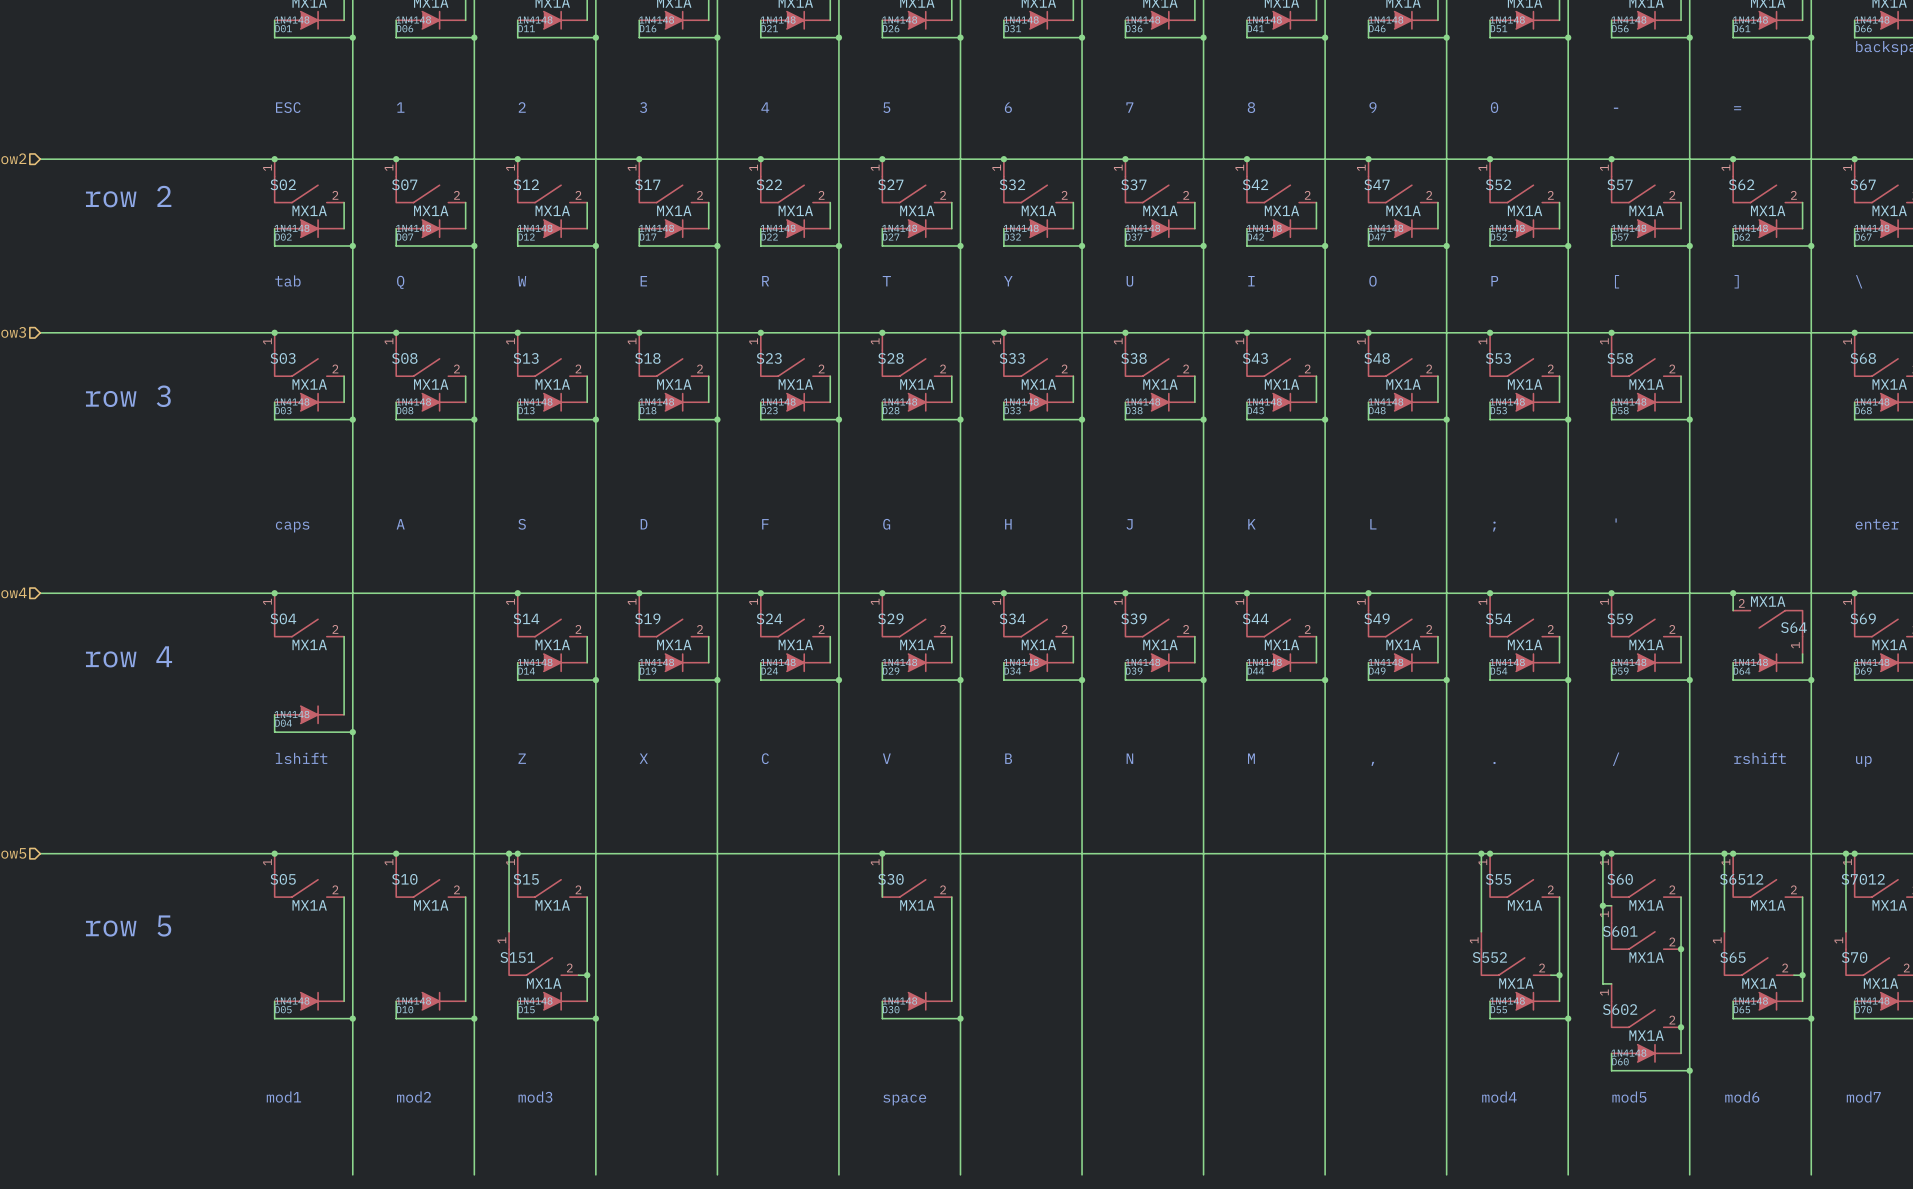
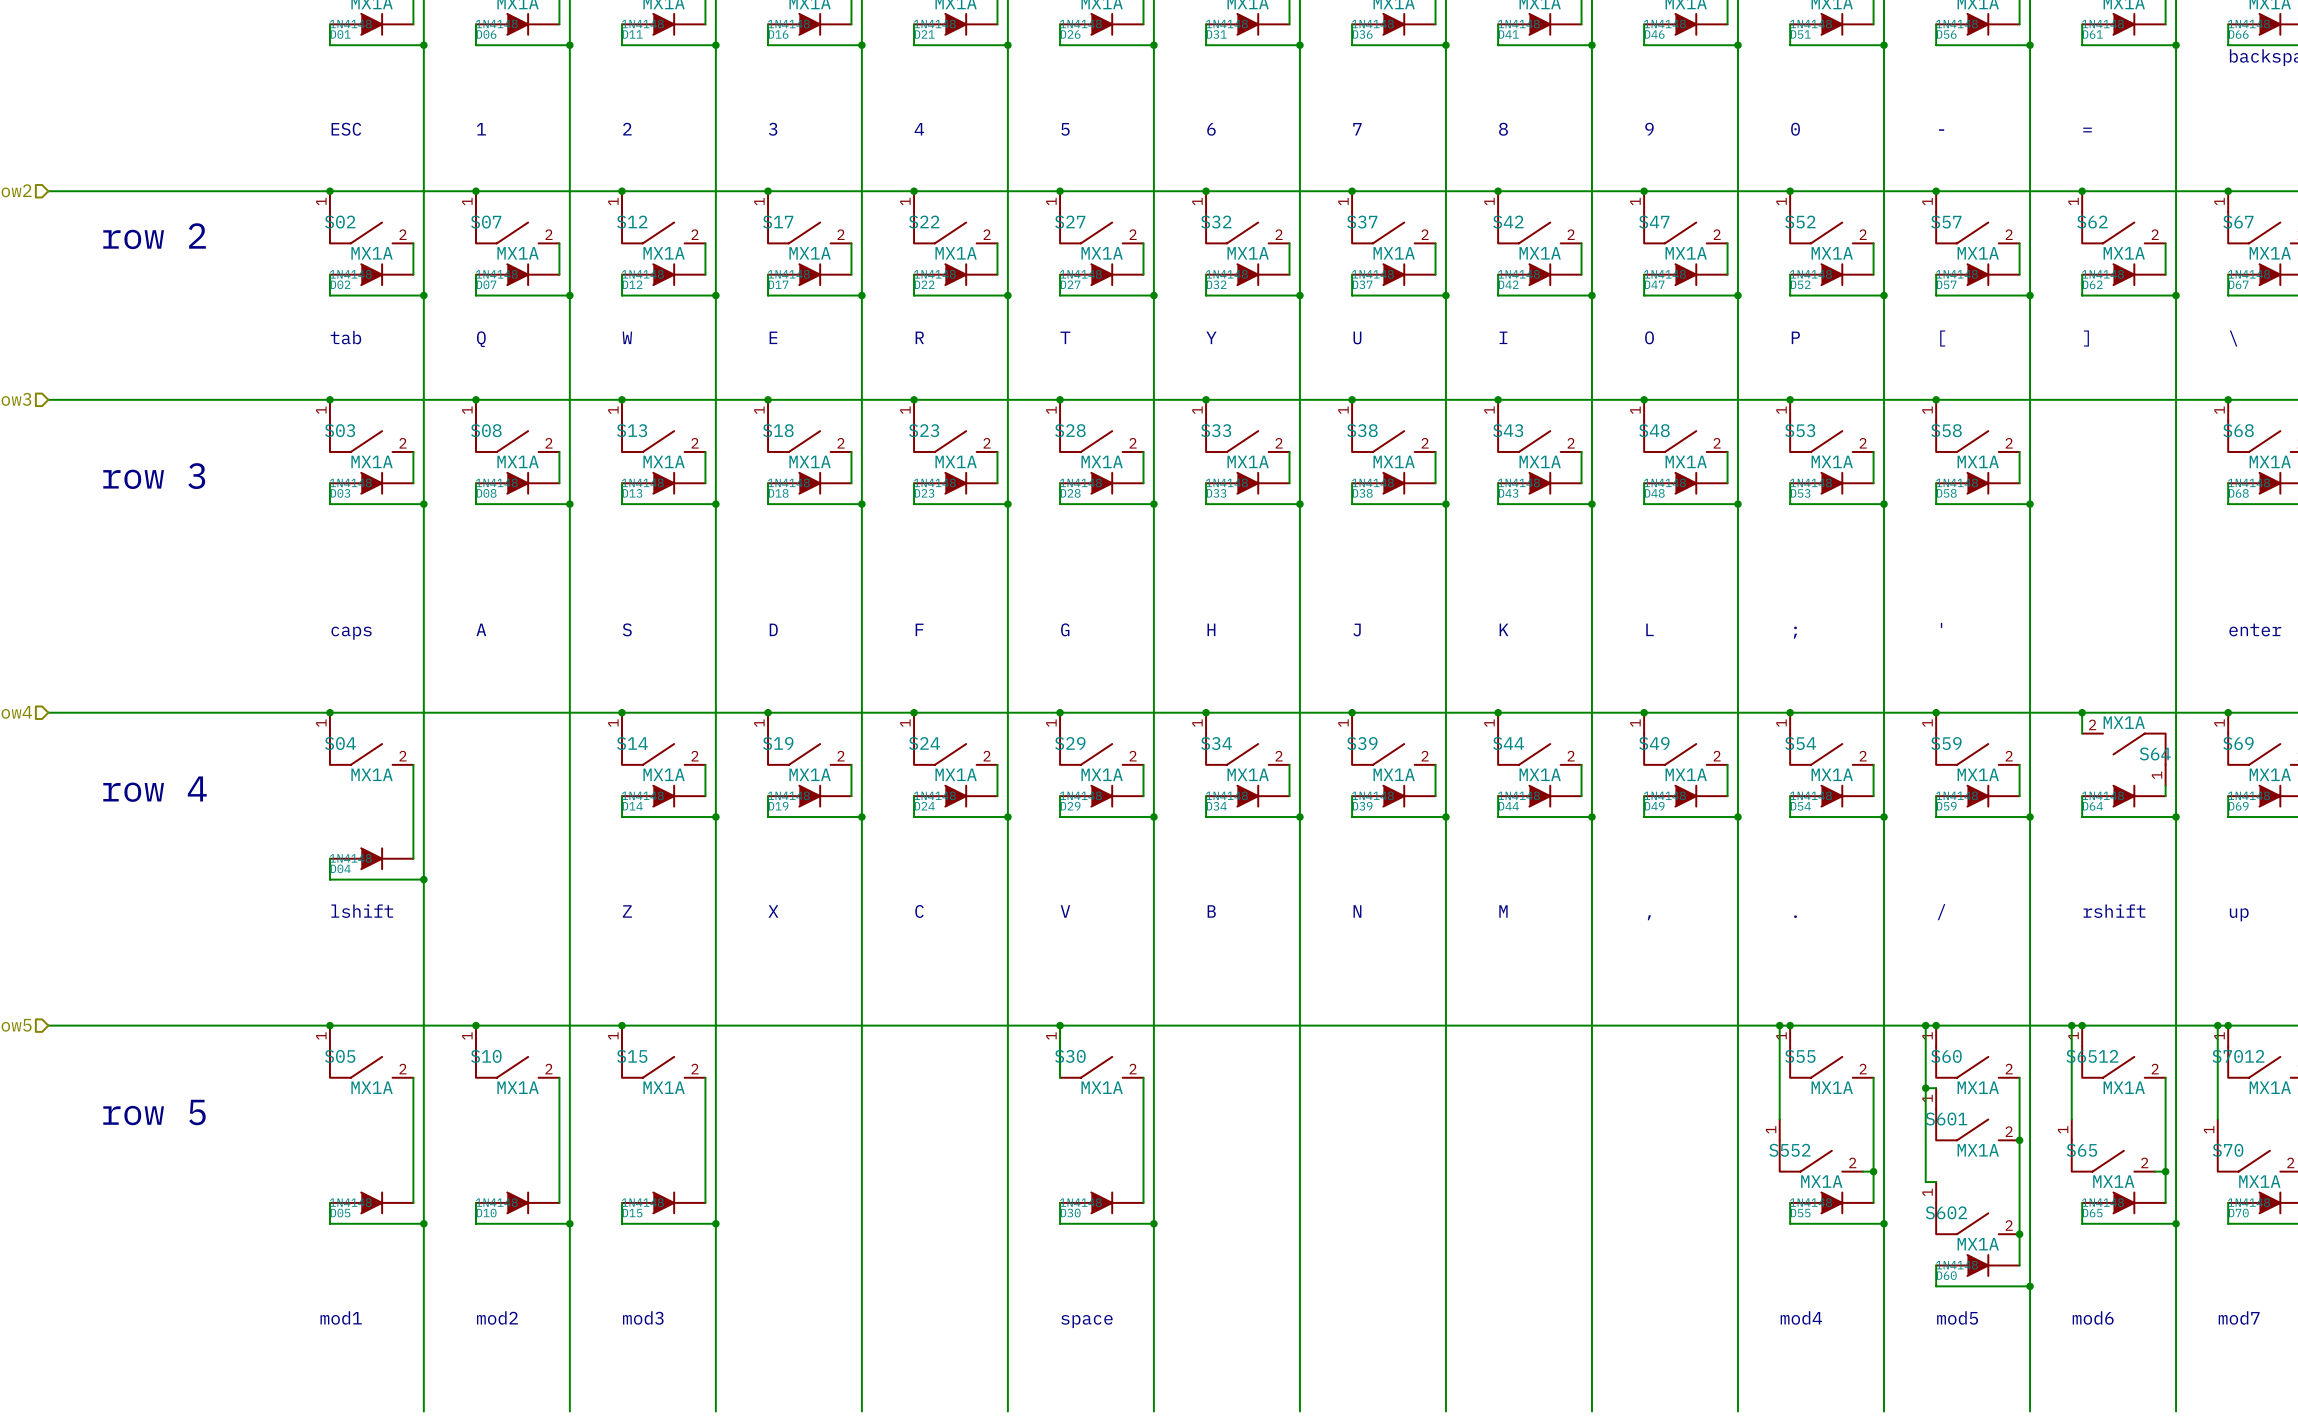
wire: (509, 853) (509, 931) -> none
junction: (509, 853) -> none
S151: MX1A (543, 953) -> none
wire: (578, 975) (587, 975) -> none
junction: (587, 975) -> none

